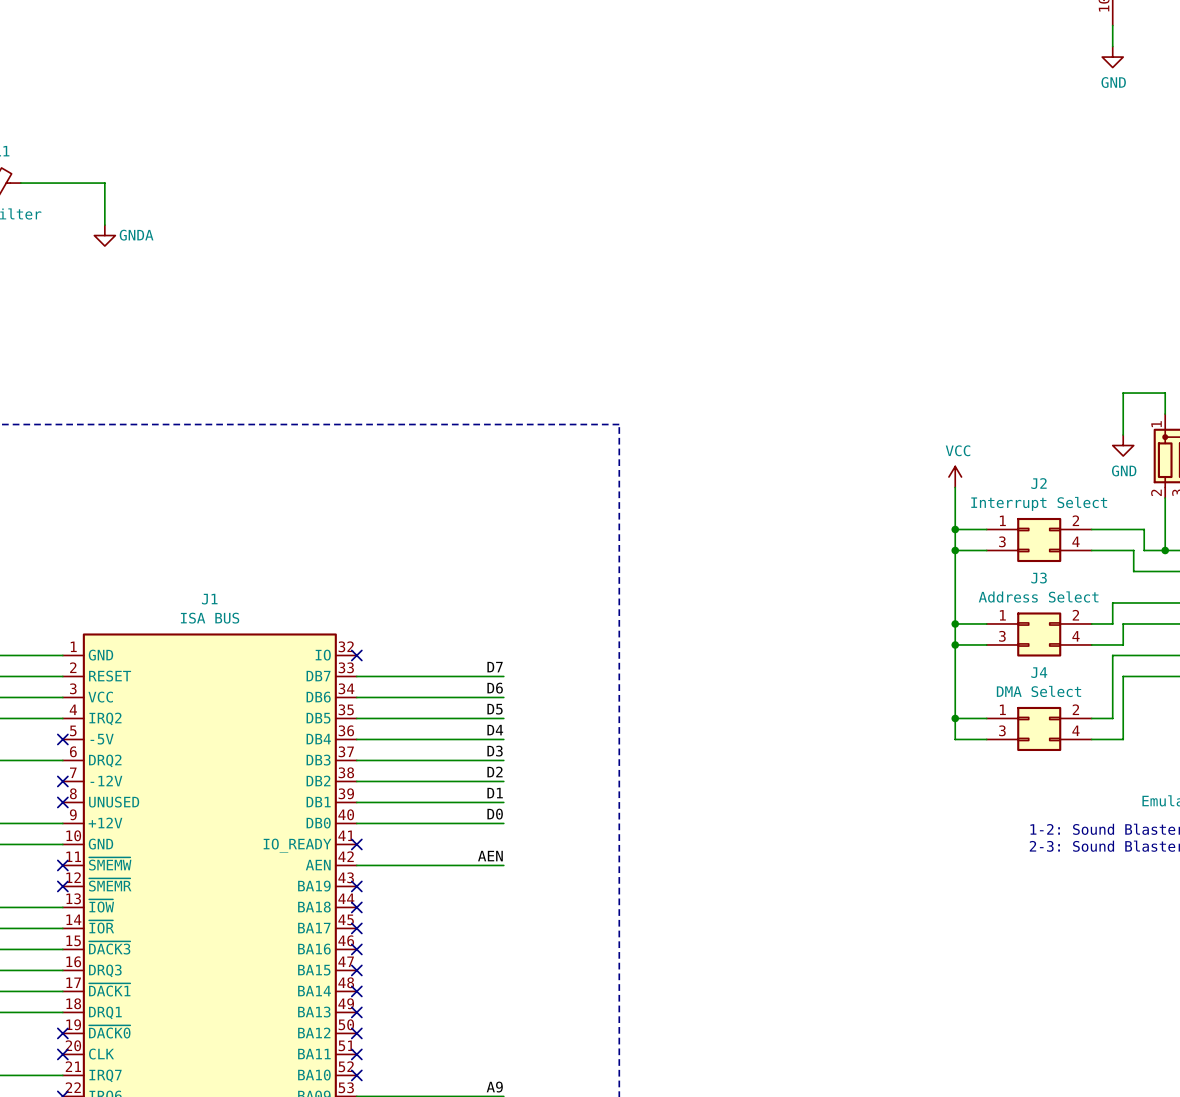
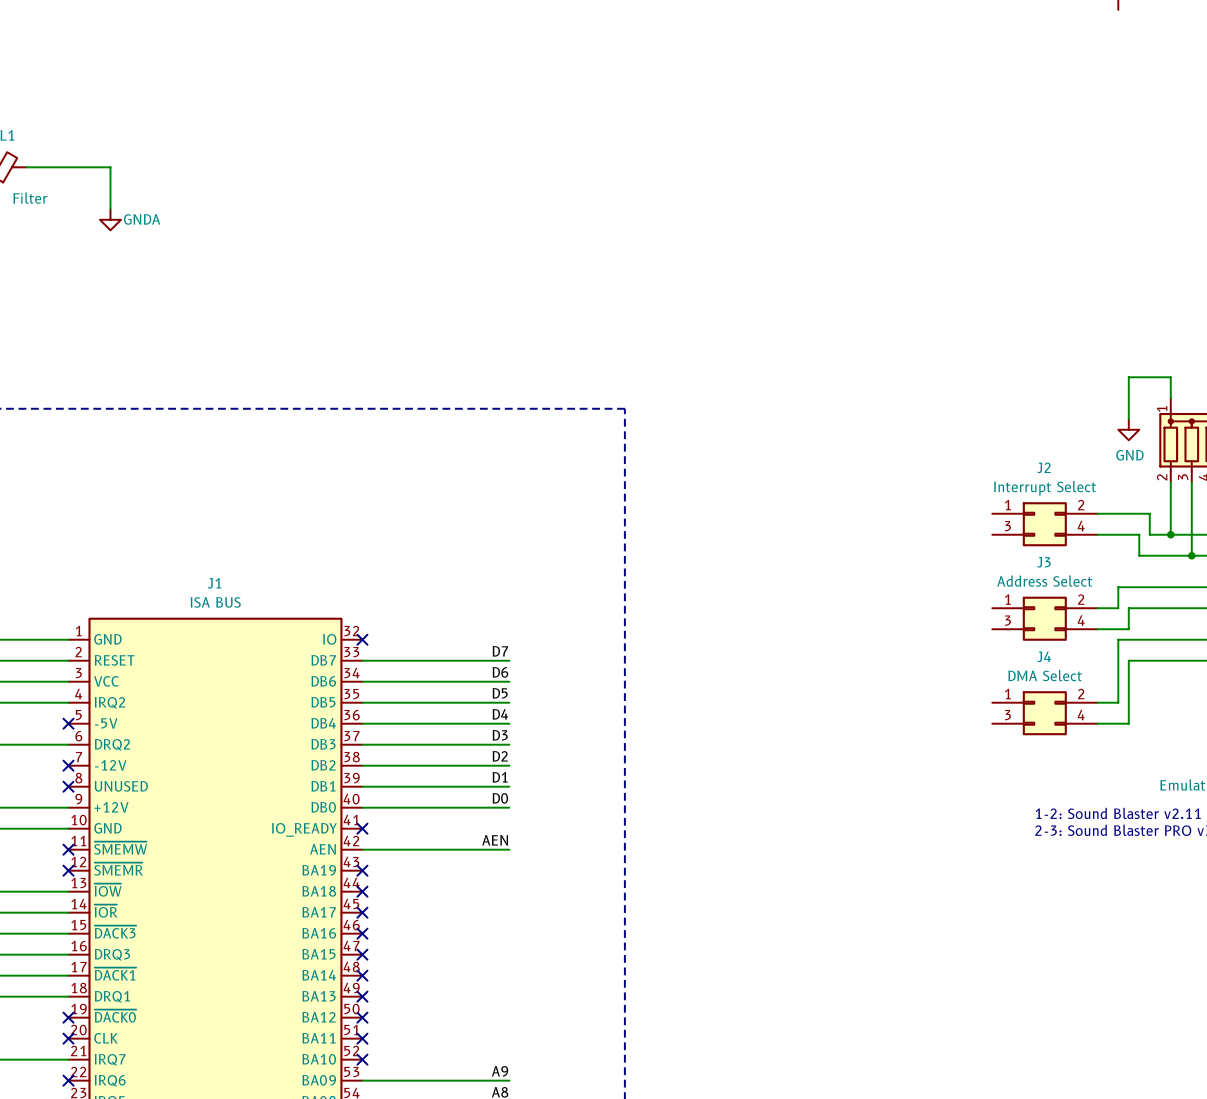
wire: (1112, 25) (1112, 46) -> none
power symbol: GND (1112, 57) -> none
power symbol: VCC (955, 477) -> none
wire: (955, 487) (955, 739) (986, 739) -> none
wire: (955, 529) (986, 529) -> none
junction: (955, 529) -> none
wire: (955, 550) (986, 550) -> none
junction: (955, 550) -> none
wire: (955, 623) (986, 623) -> none
junction: (955, 623) -> none
wire: (955, 644) (986, 644) -> none
junction: (955, 644) -> none
wire: (955, 718) (986, 718) -> none
junction: (955, 718) -> none

